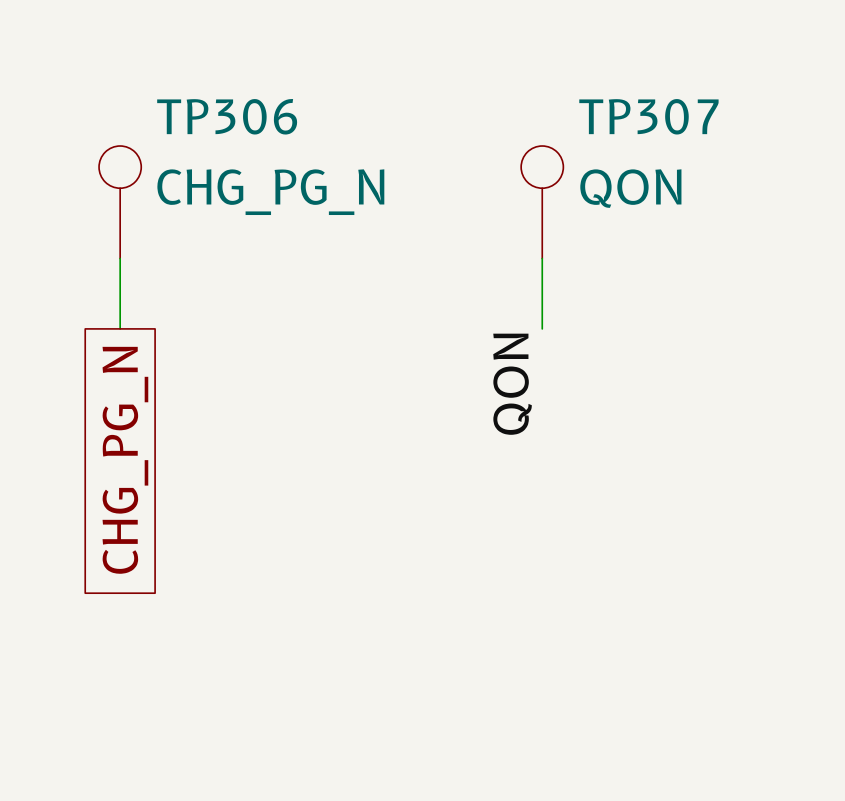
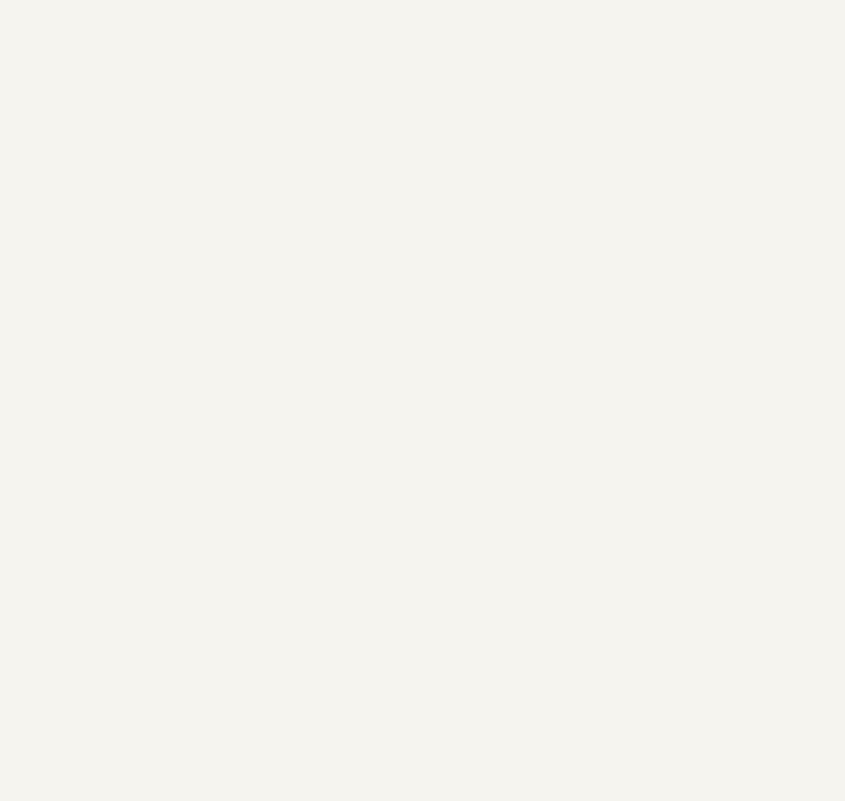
TP306: CHG_PG_N (120, 202) -> none
TP307: QON (542, 202) -> none
wire: (120, 258) (120, 328) -> none
wire: (542, 258) (542, 328) -> none
label: QON (512, 384) -> none
global label: CHG_PG_N (125, 460) -> none

